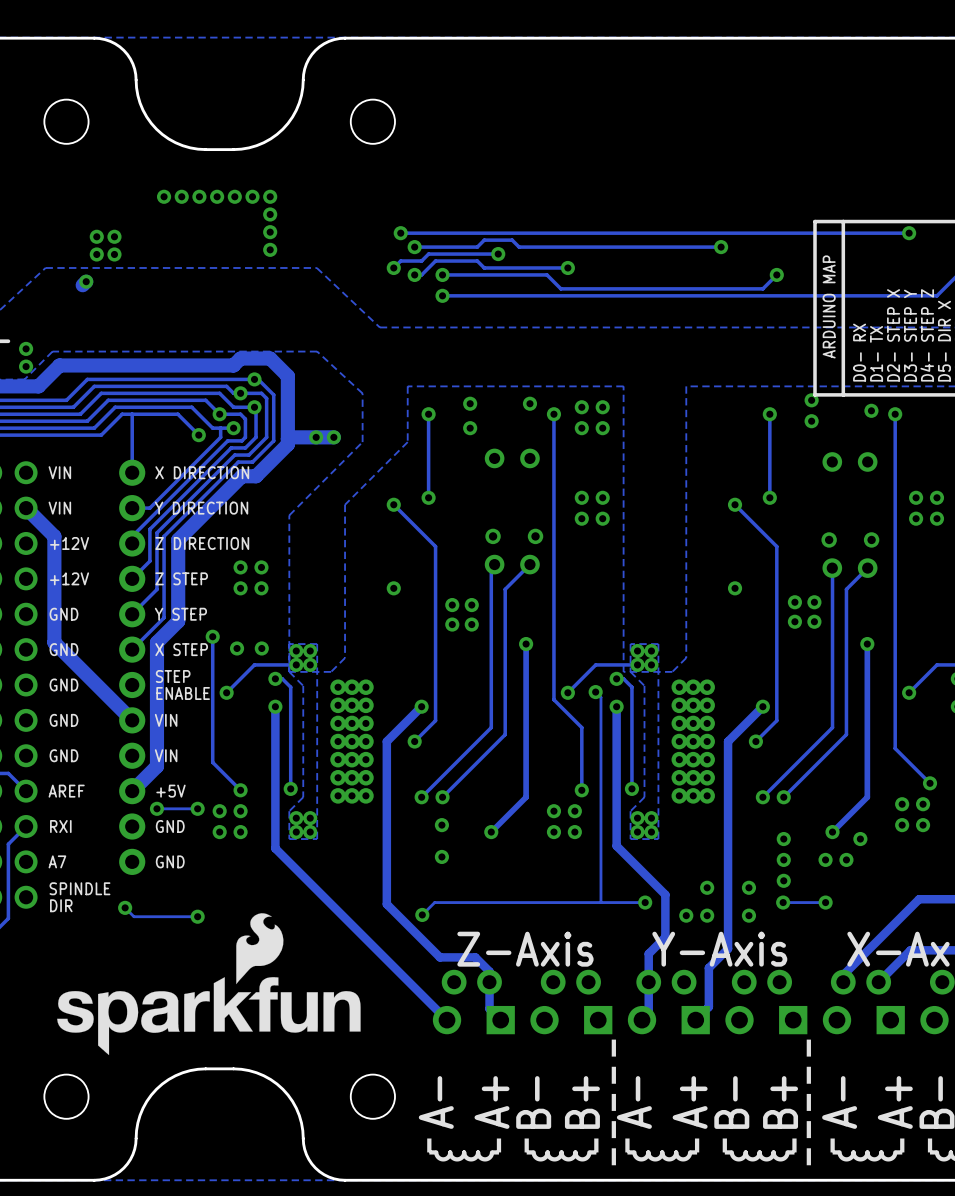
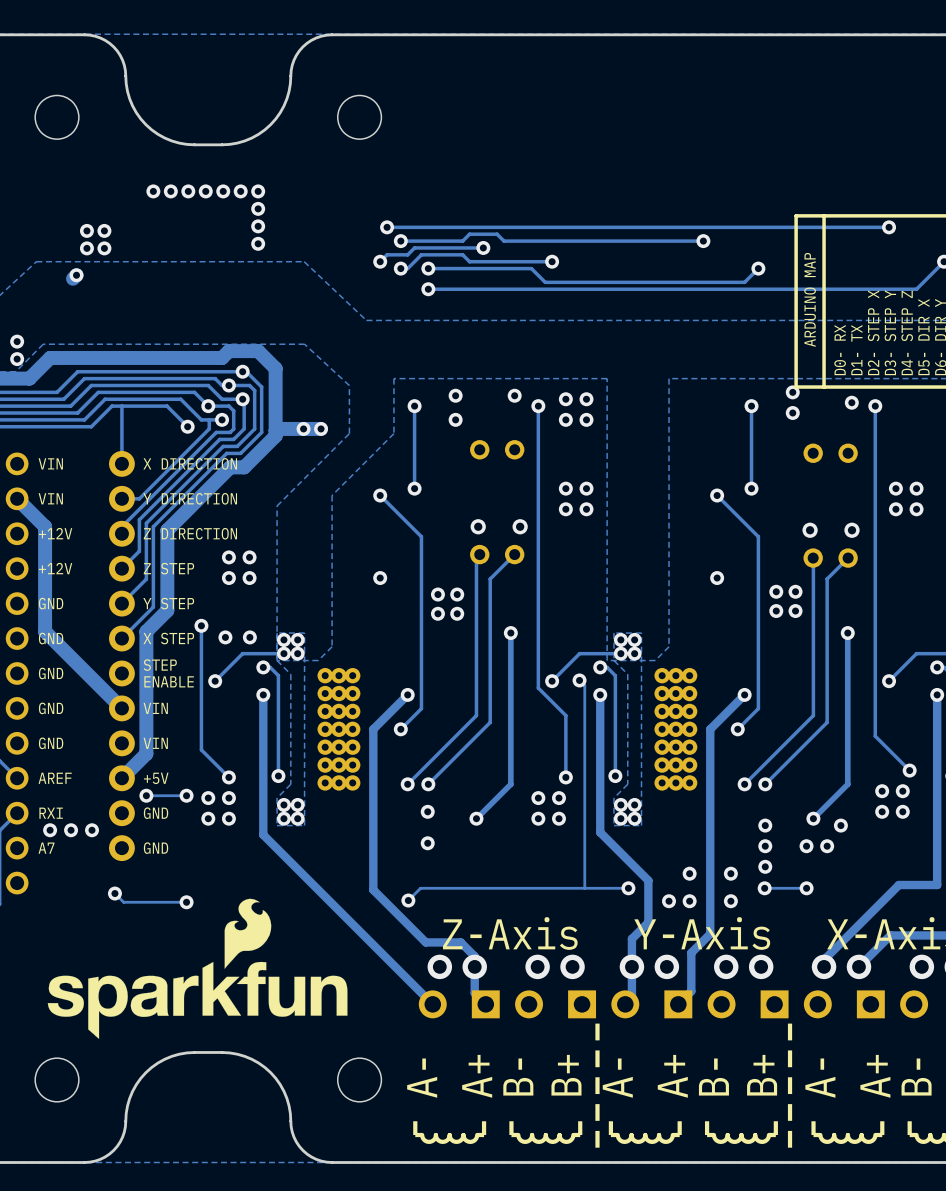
via: none -> (50, 830)
via: none -> (71, 830)
via: none -> (92, 830)
text: SPINDLE (79, 888) -> none
text: DIR (61, 905) -> none

